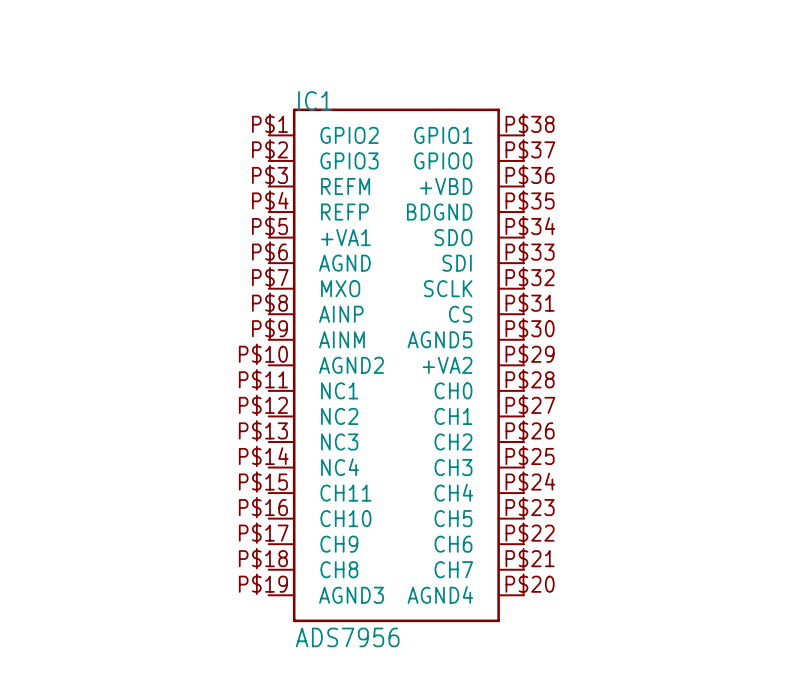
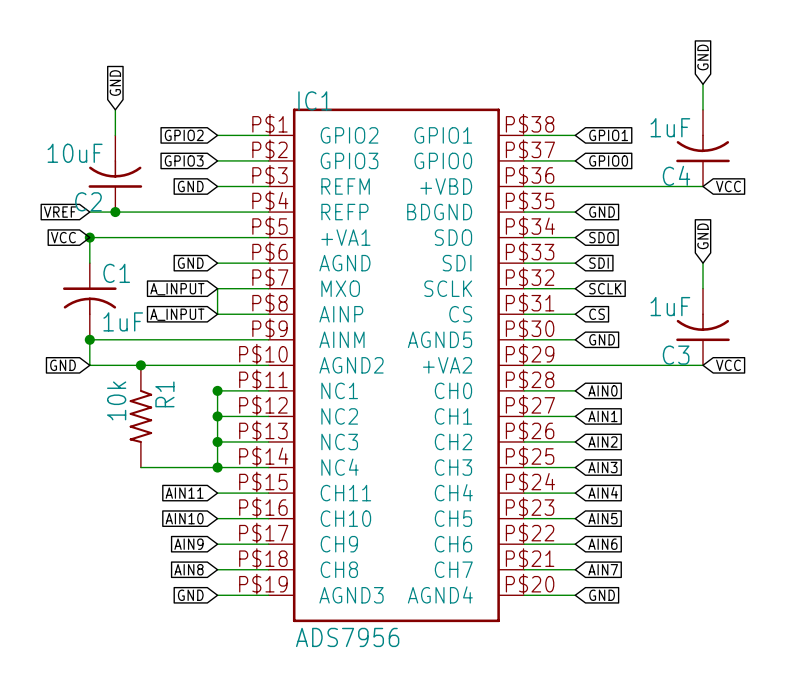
global label: none -> GND (703, 57)
global label: none -> GND (115, 83)
wire: none -> (703, 84) (703, 109)
wire: none -> (115, 109) (115, 135)
global label: none -> GPIO2 (184, 135)
wire: none -> (217, 135) (268, 135)
wire: none -> (524, 135) (575, 135)
global label: none -> GPIO1 (608, 135)
C4: none -> 1uF (703, 148)
global label: none -> GPIO3 (184, 160)
wire: none -> (217, 160) (268, 160)
wire: none -> (524, 160) (575, 160)
global label: none -> GPIO0 (608, 160)
C2: none -> 10uF (115, 173)
global label: none -> GND (190, 186)
wire: none -> (217, 186) (268, 186)
wire: none -> (524, 186) (703, 186)
global label: none -> VCC (728, 186)
global label: none -> VREF (60, 212)
wire: none -> (89, 212) (268, 212)
junction: none -> (115, 212)
wire: none -> (524, 212) (575, 212)
global label: none -> GND (602, 212)
global label: none -> GND (703, 236)
global label: none -> VCC (63, 237)
junction: none -> (89, 237)
wire: none -> (268, 237) (89, 237) (89, 263)
wire: none -> (524, 237) (575, 237)
global label: none -> SDO (601, 237)
global label: none -> GND (190, 263)
wire: none -> (217, 263) (268, 263)
wire: none -> (524, 263) (575, 263)
global label: none -> SDI (599, 263)
wire: none -> (703, 263) (703, 288)
wire: none -> (268, 288) (217, 288) (217, 314) (268, 314)
wire: none -> (524, 288) (575, 288)
global label: none -> SCLK (605, 288)
global label: none -> A_INPUT (177, 289)
C1: none -> 1uF (89, 301)
global label: none -> A_INPUT (177, 314)
wire: none -> (524, 314) (575, 314)
global label: none -> CS (597, 314)
C3: none -> 1uF (703, 327)
junction: none -> (89, 339)
wire: none -> (268, 339) (89, 339) (89, 365) (268, 365)
wire: none -> (524, 339) (575, 339)
global label: none -> GND (602, 339)
global label: none -> GND (63, 365)
junction: none -> (140, 365)
wire: none -> (524, 365) (703, 365)
global label: none -> VCC (728, 365)
junction: none -> (217, 390)
wire: none -> (268, 390) (217, 390) (217, 467)
wire: none -> (524, 390) (575, 390)
global label: none -> AIN0 (602, 390)
R1: none -> 10k (140, 416)
wire: none -> (217, 416) (268, 416)
junction: none -> (217, 416)
wire: none -> (524, 416) (575, 416)
global label: none -> AIN1 (602, 416)
wire: none -> (217, 441) (268, 441)
junction: none -> (217, 441)
wire: none -> (524, 441) (575, 441)
global label: none -> AIN2 (602, 441)
wire: none -> (140, 467) (268, 467)
junction: none -> (217, 467)
wire: none -> (524, 467) (575, 467)
global label: none -> AIN3 (602, 467)
global label: none -> AIN4 (603, 492)
global label: none -> AIN11 (184, 493)
wire: none -> (217, 493) (268, 493)
wire: none -> (524, 493) (575, 493)
global label: none -> AIN10 (184, 518)
wire: none -> (217, 518) (268, 518)
wire: none -> (524, 518) (575, 518)
global label: none -> AIN5 (602, 518)
global label: none -> AIN9 (188, 544)
wire: none -> (217, 544) (268, 544)
wire: none -> (524, 544) (575, 544)
global label: none -> AIN6 (602, 544)
global label: none -> AIN8 (188, 569)
wire: none -> (217, 569) (268, 569)
wire: none -> (524, 569) (575, 569)
global label: none -> AIN7 (603, 569)
global label: none -> GND (190, 595)
wire: none -> (217, 595) (268, 595)
wire: none -> (524, 595) (575, 595)
global label: none -> GND (602, 595)

